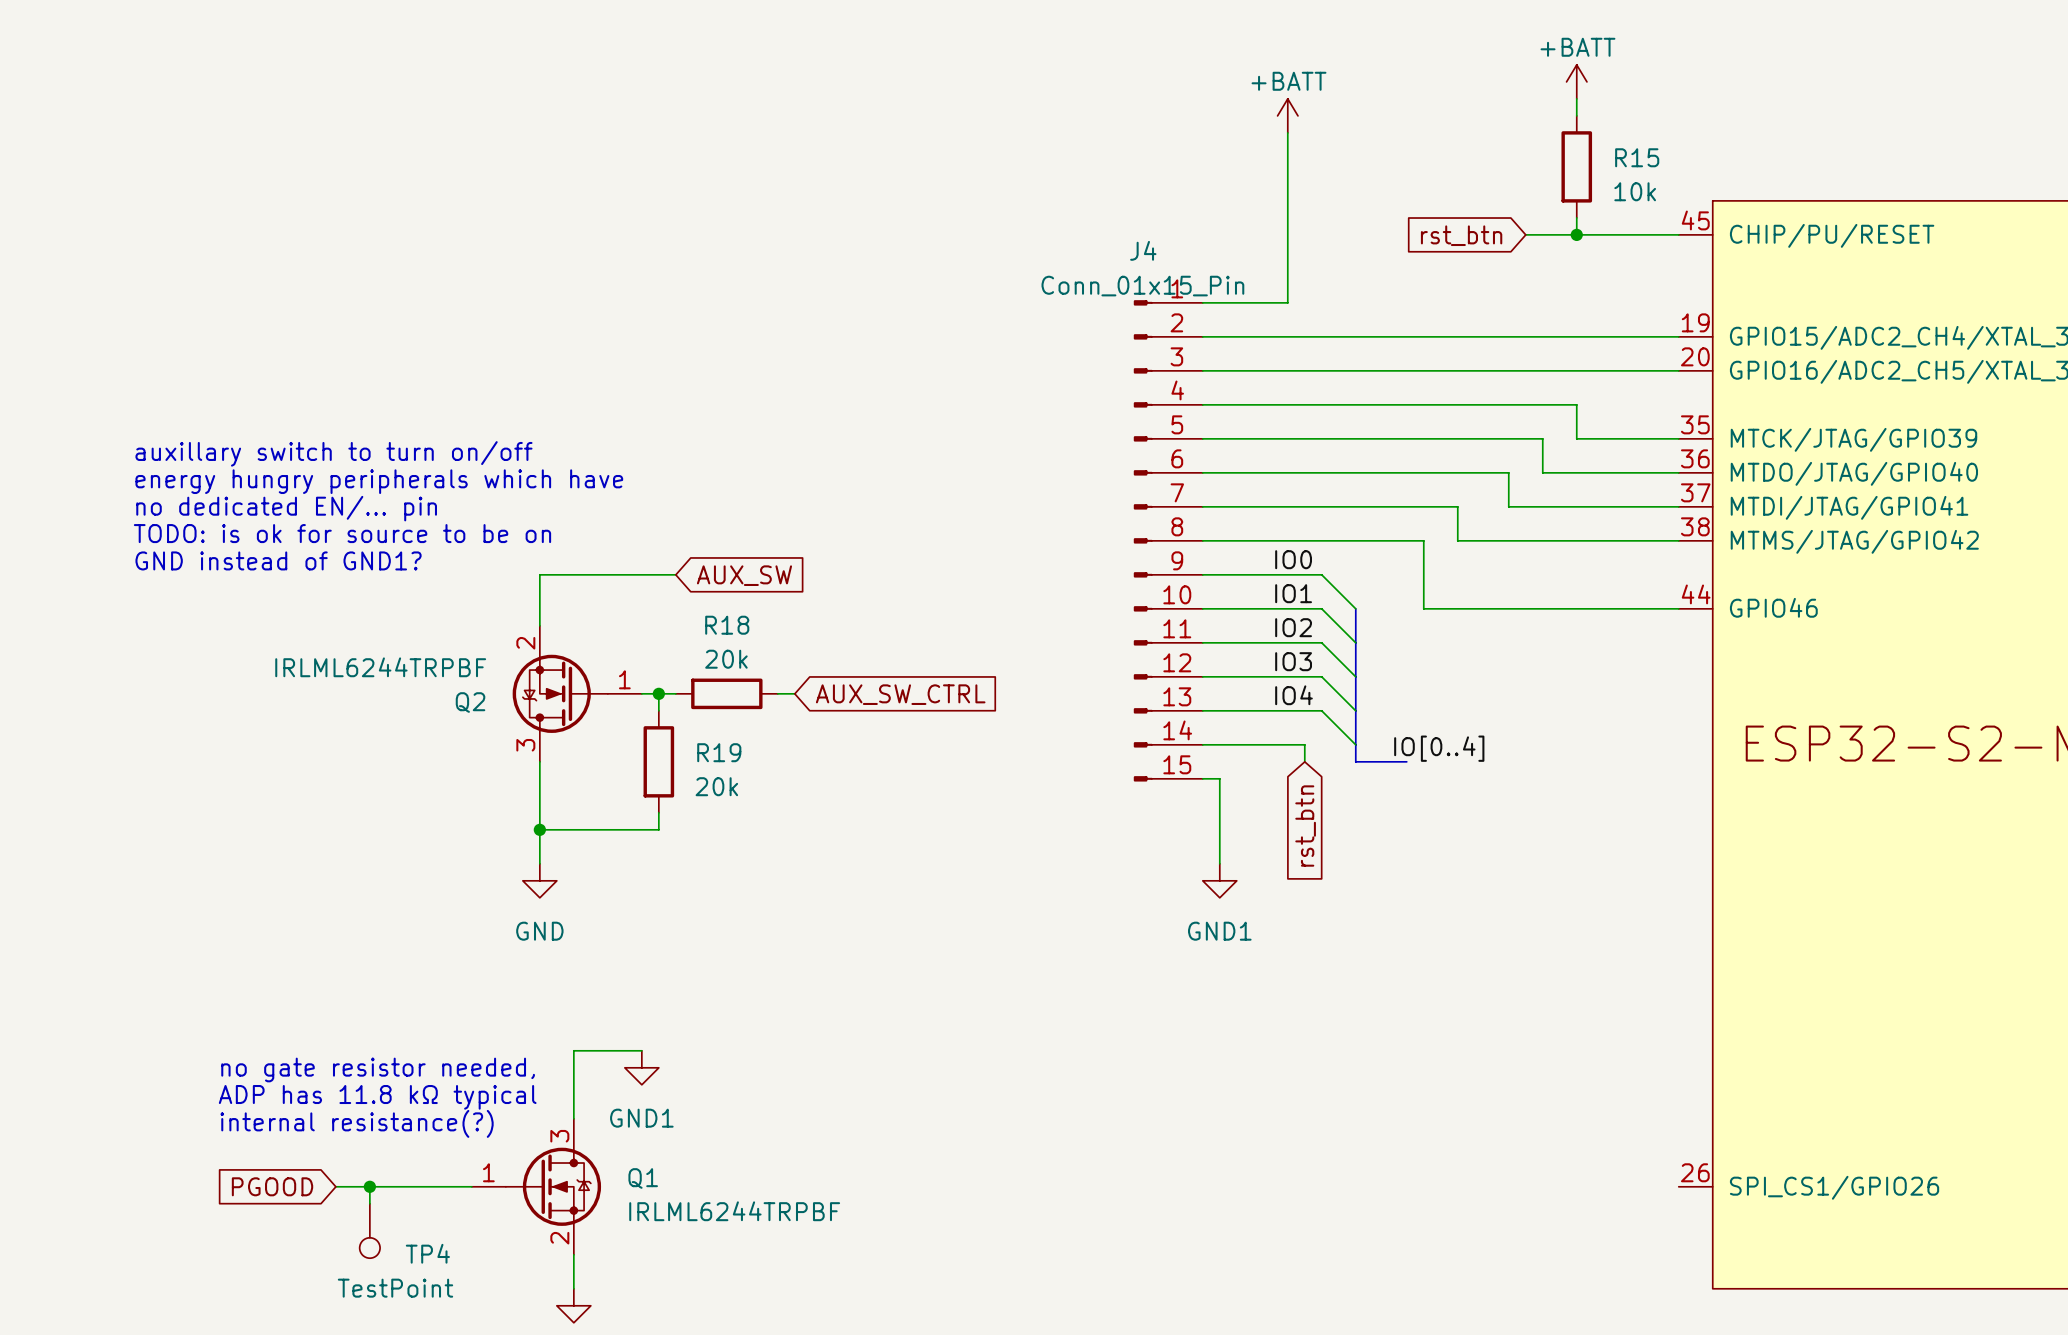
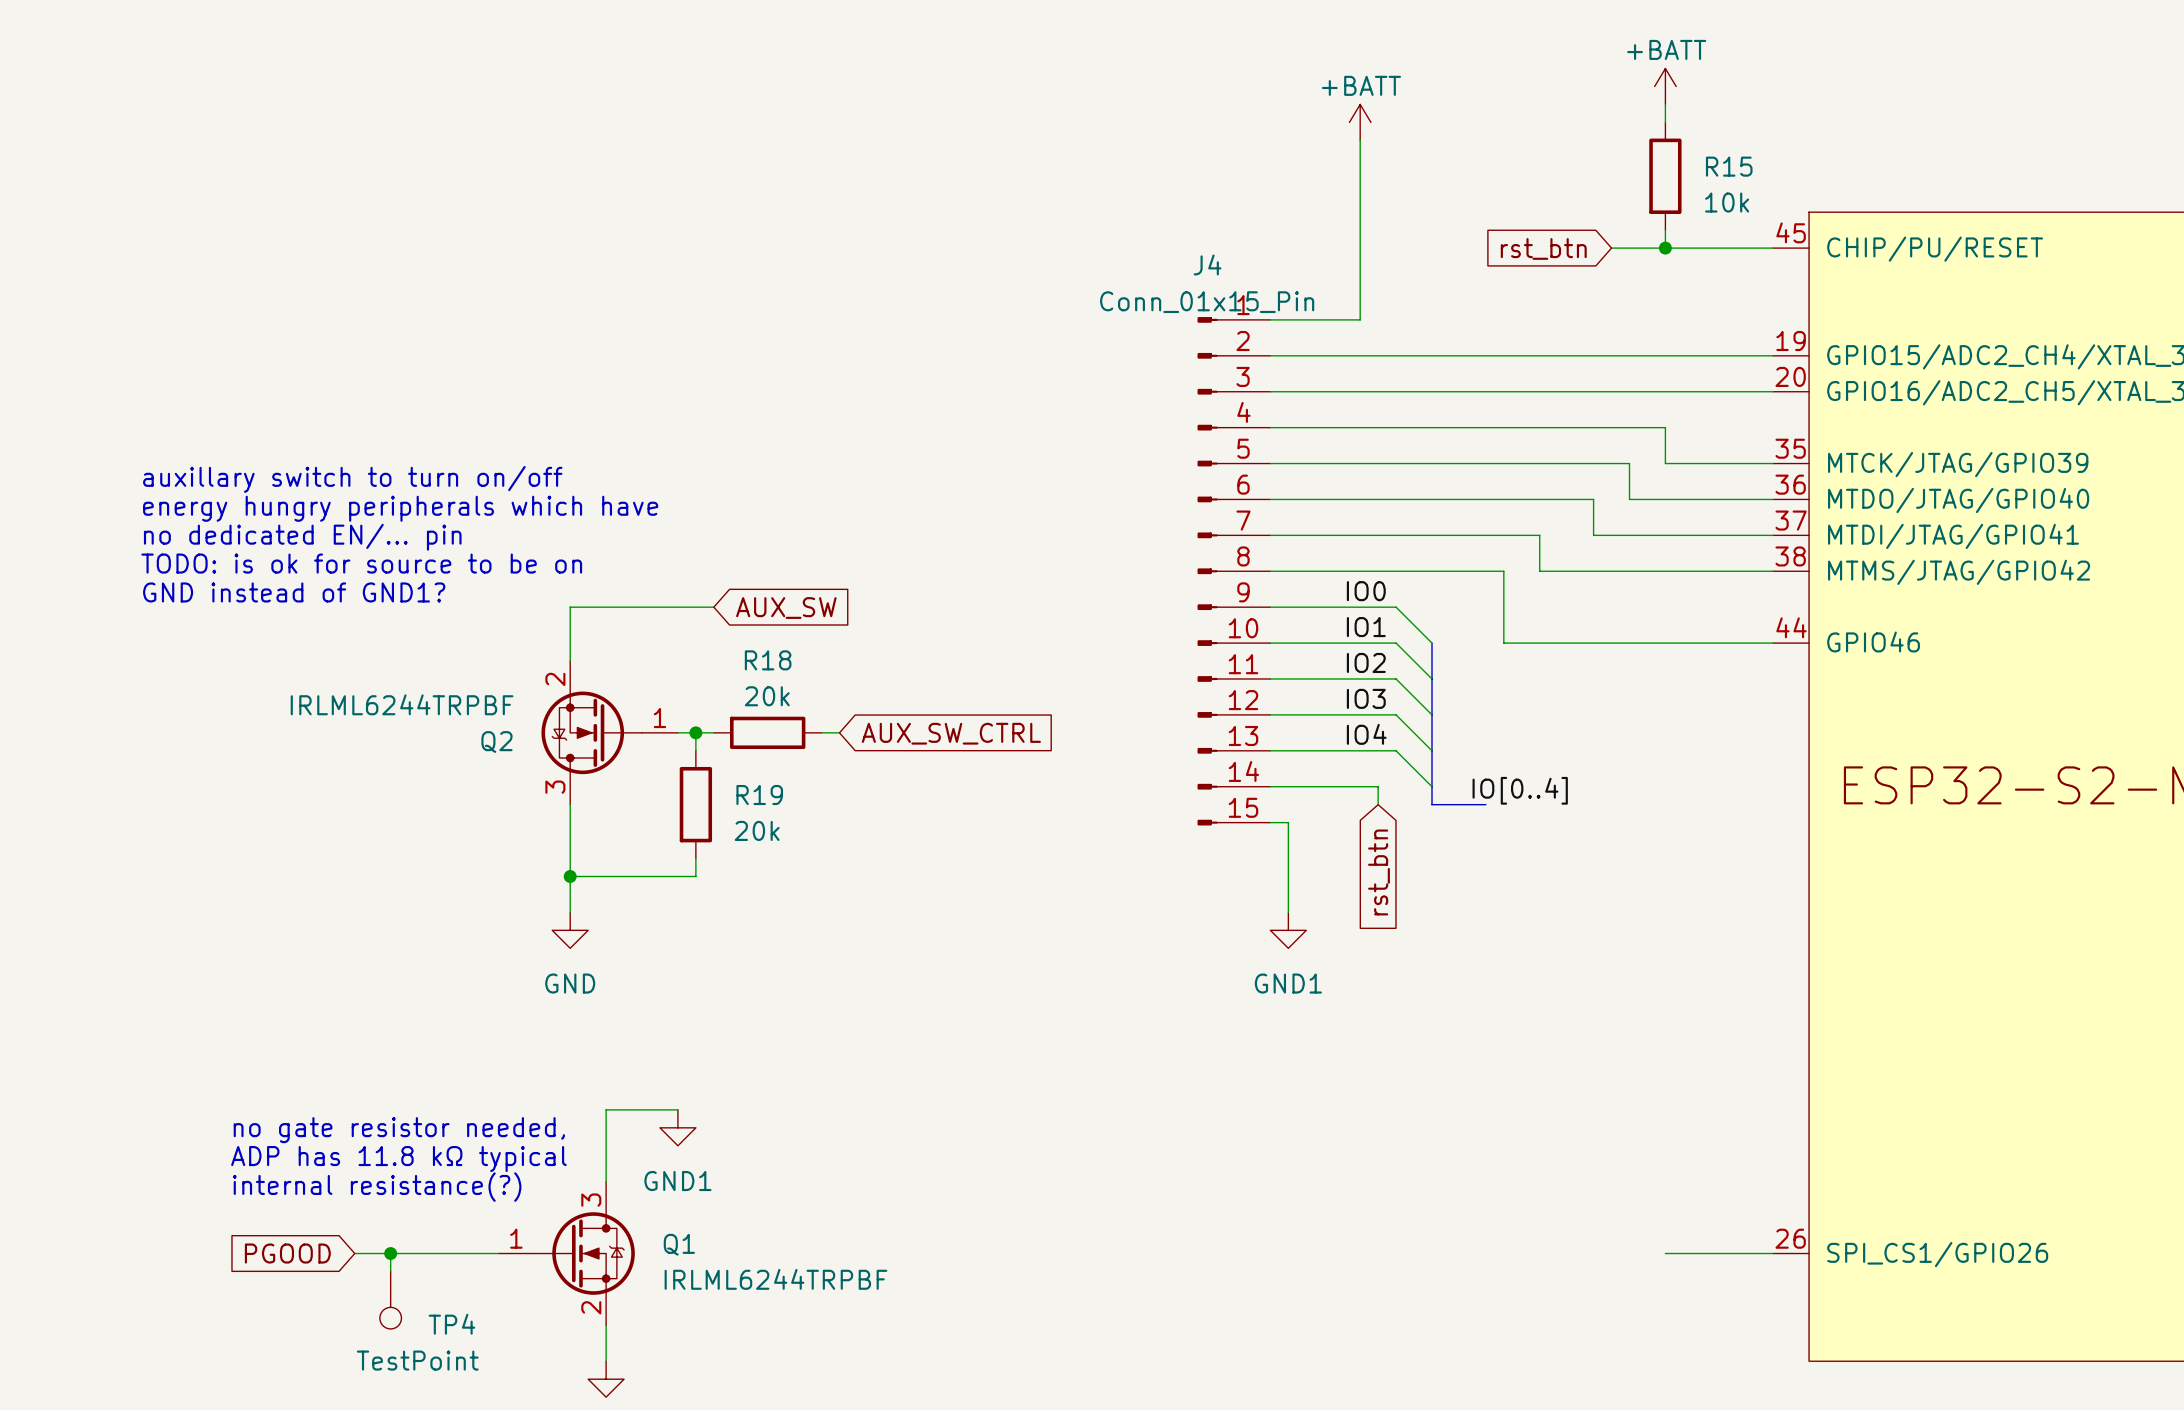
wire: none -> (1665, 1253) (1773, 1253)

